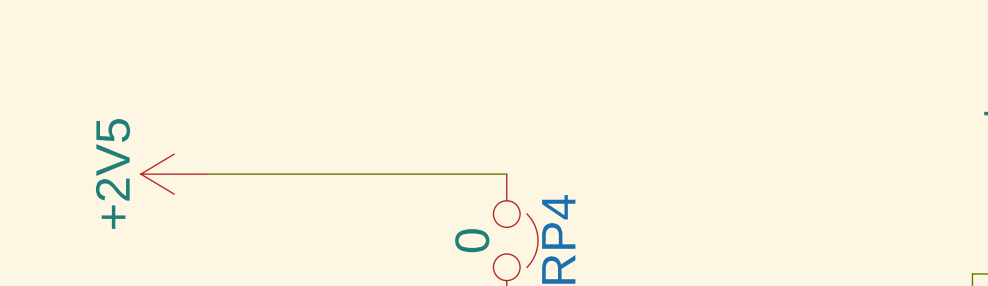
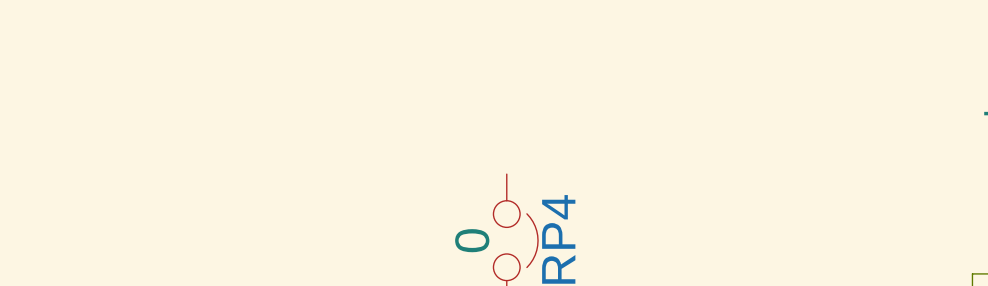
power symbol: +2V5 (174, 174) -> none
wire: (207, 174) (506, 174) -> none

